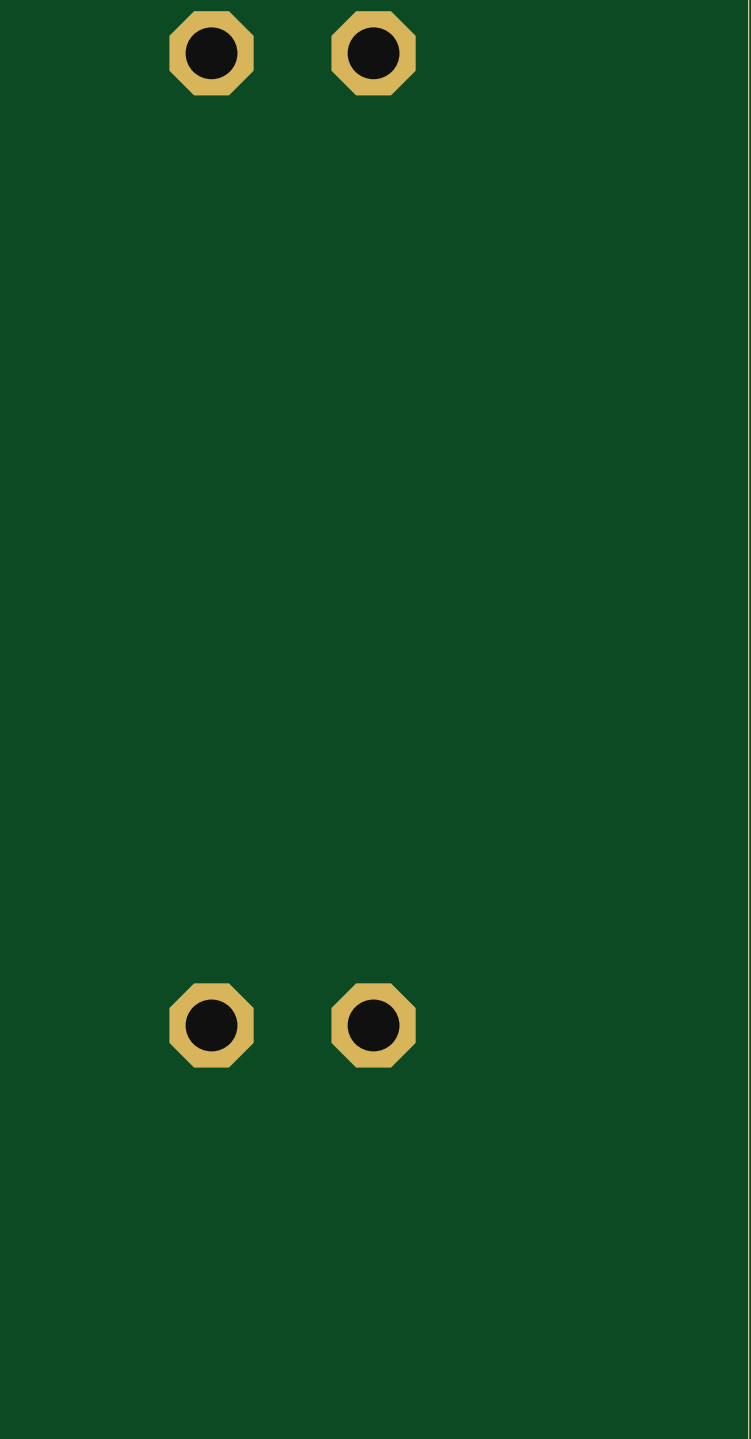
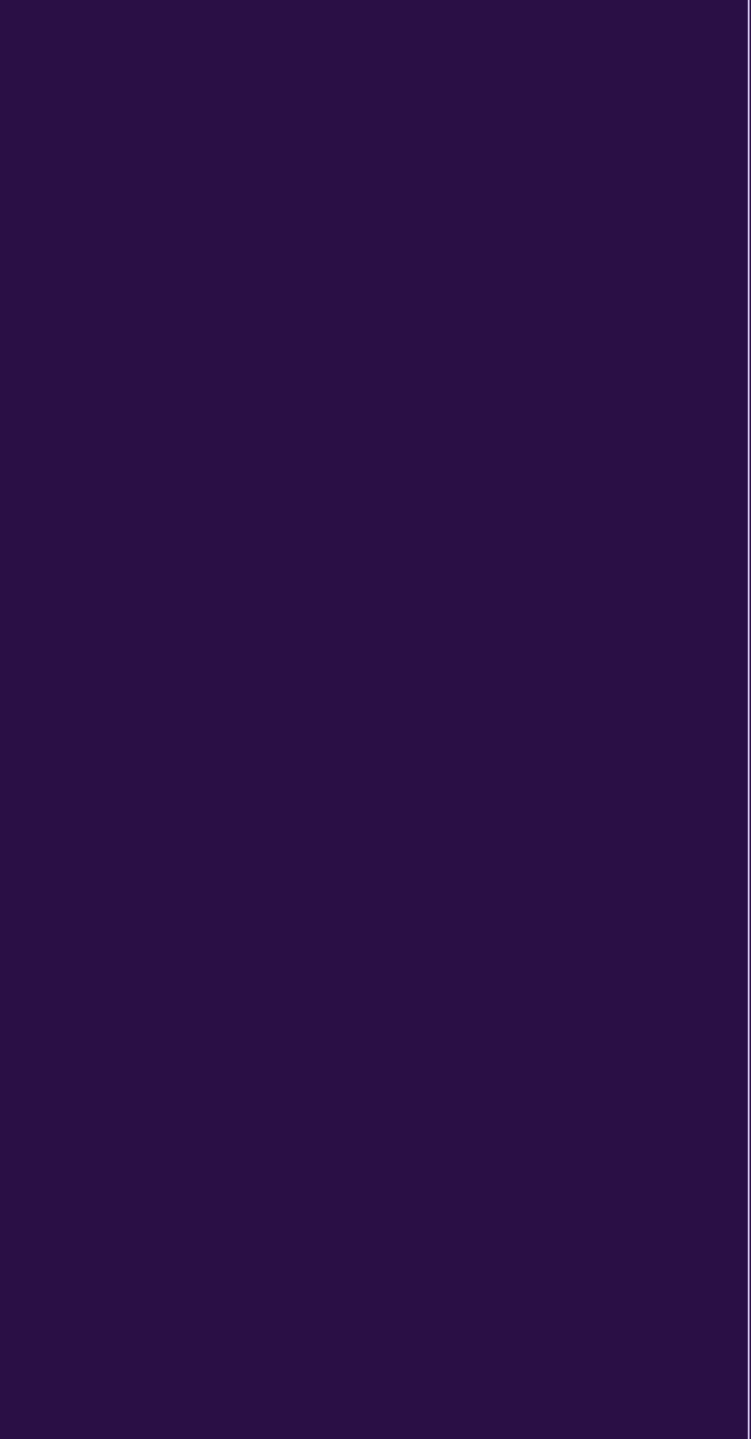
part: (292, 53) -> none
part: (292, 1025) -> none

